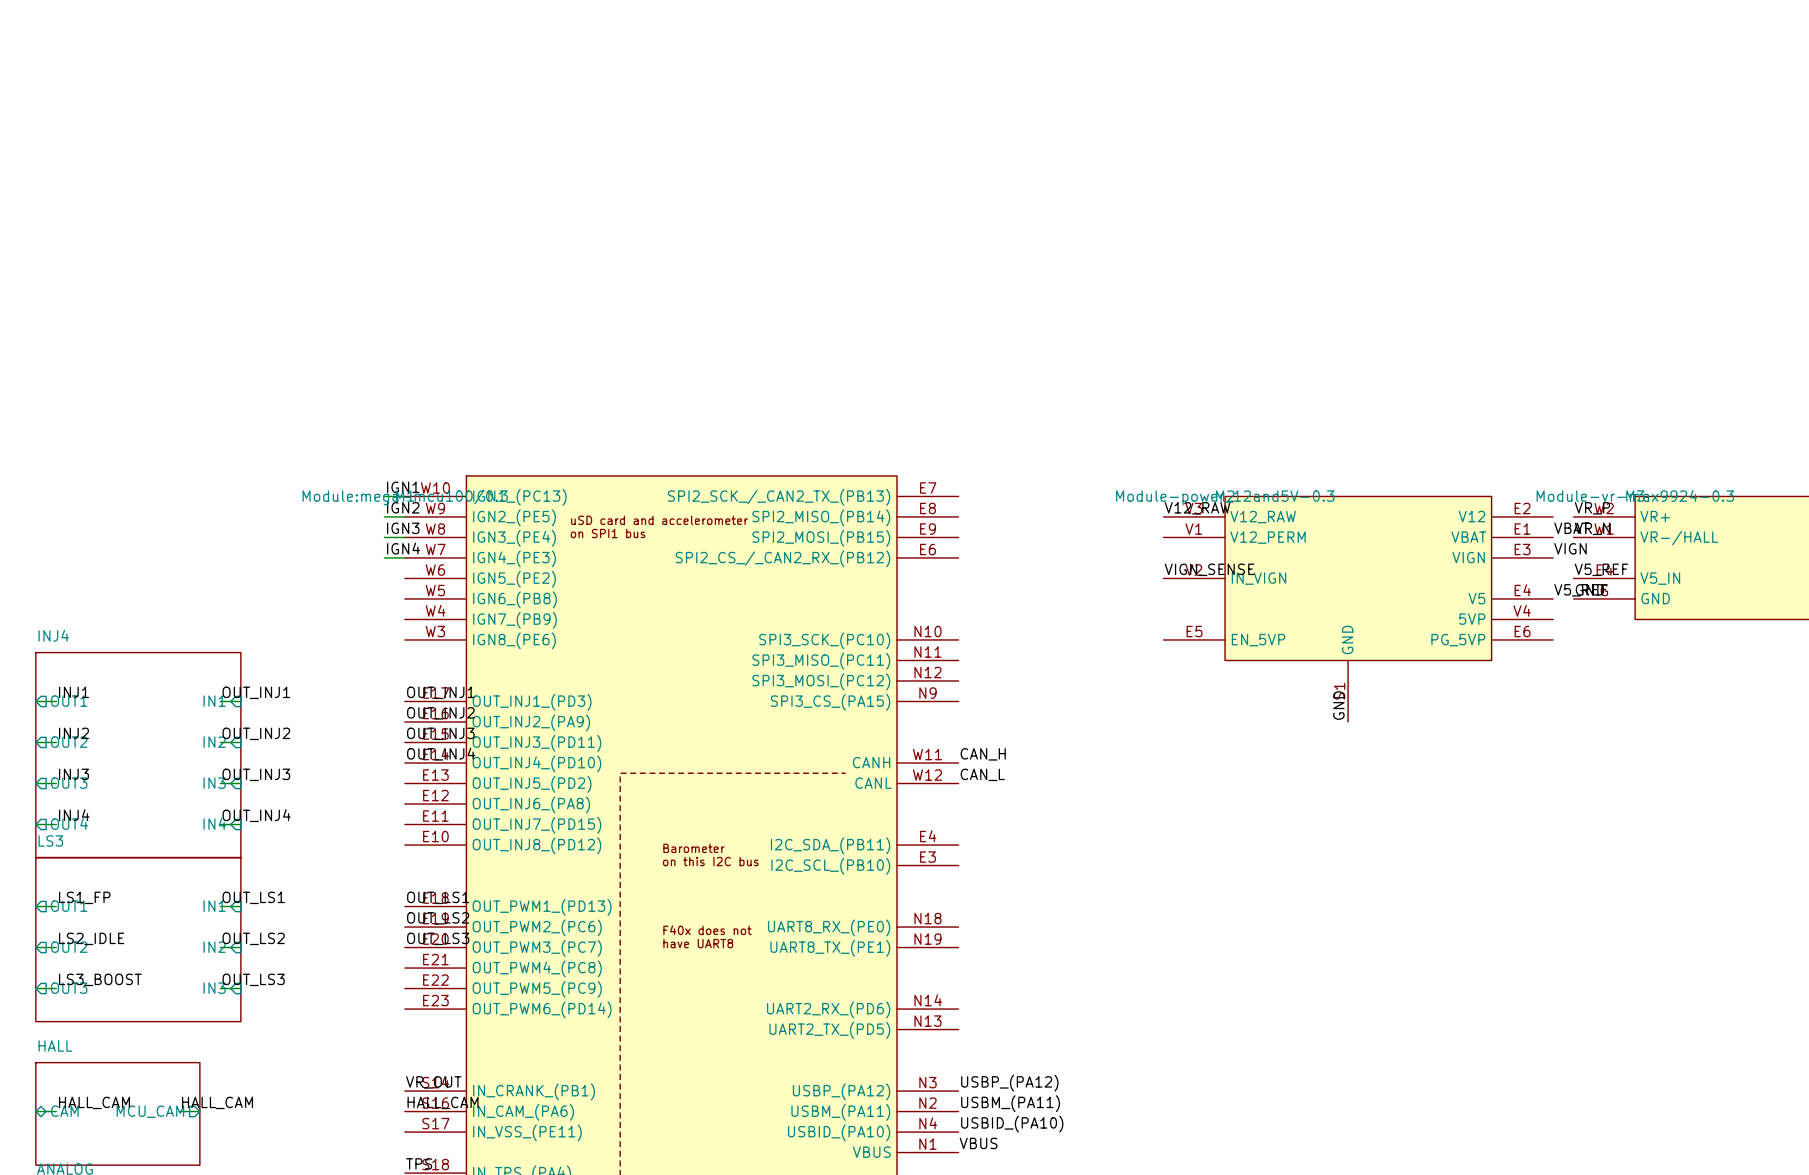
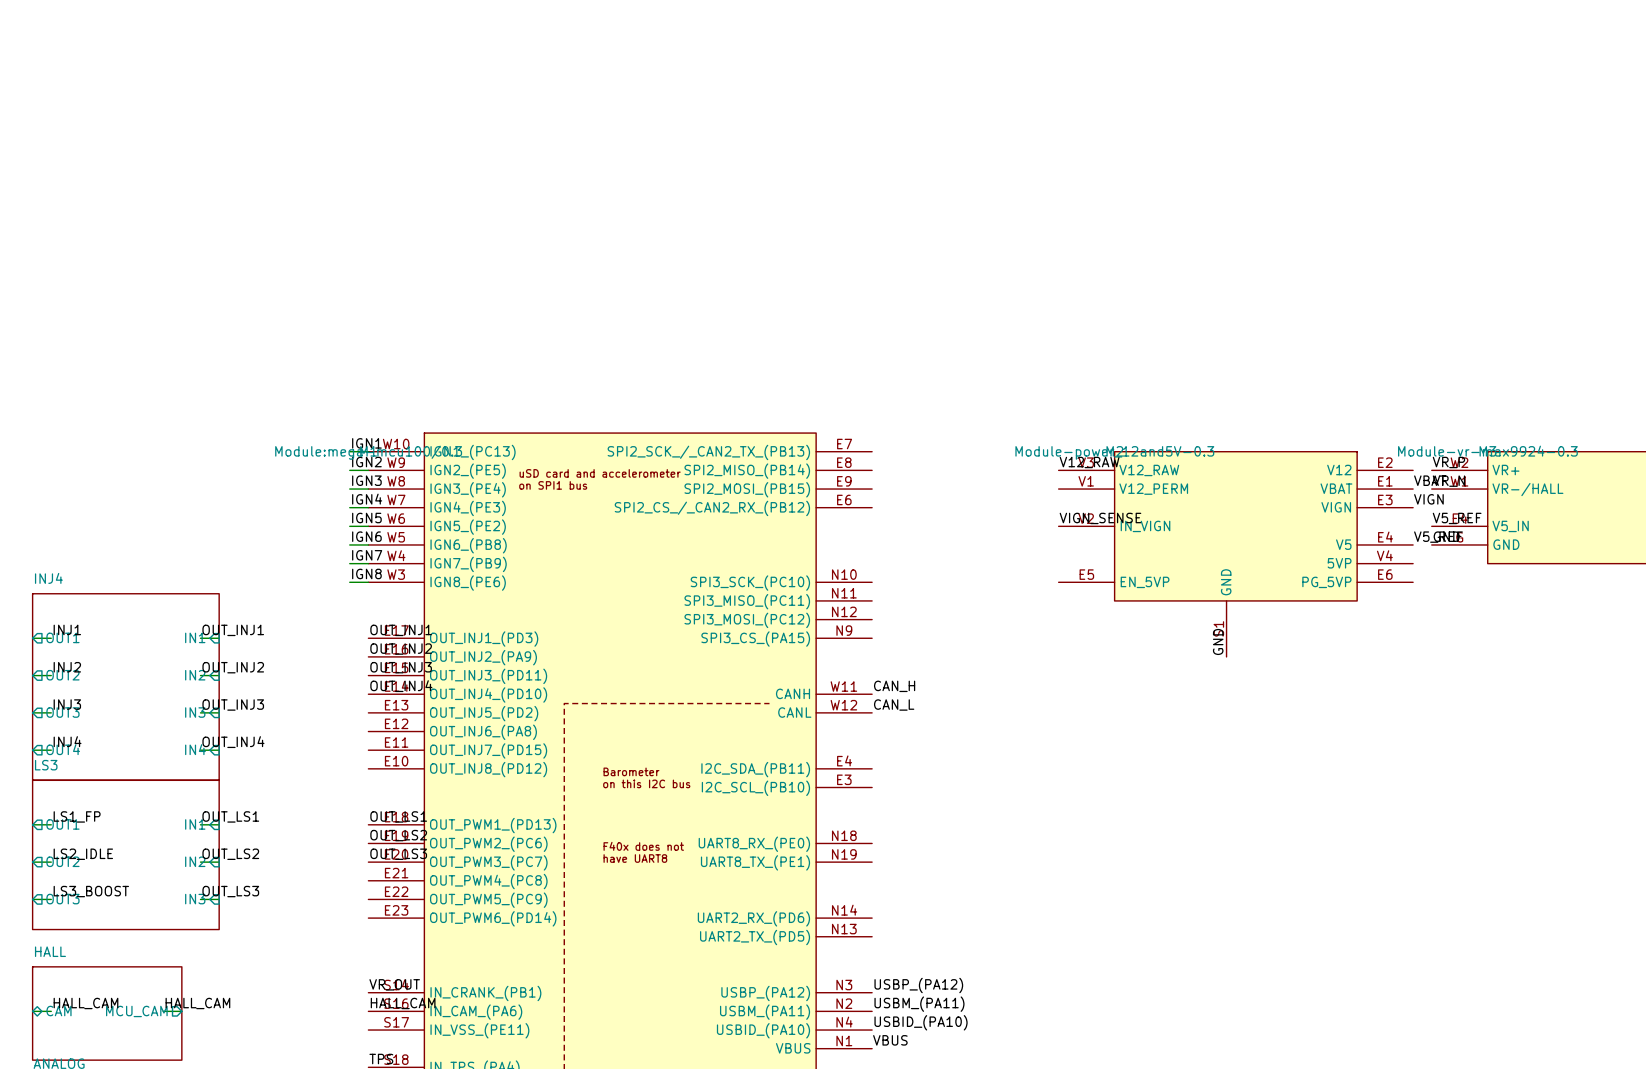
label: none -> IGN5 (366, 518)
wire: none -> (349, 526) (368, 526)
label: none -> IGN6 (366, 536)
wire: none -> (349, 544) (368, 544)
label: none -> IGN7 (367, 555)
wire: none -> (349, 563) (368, 563)
label: none -> IGN8 (366, 573)
wire: none -> (349, 582) (368, 582)

